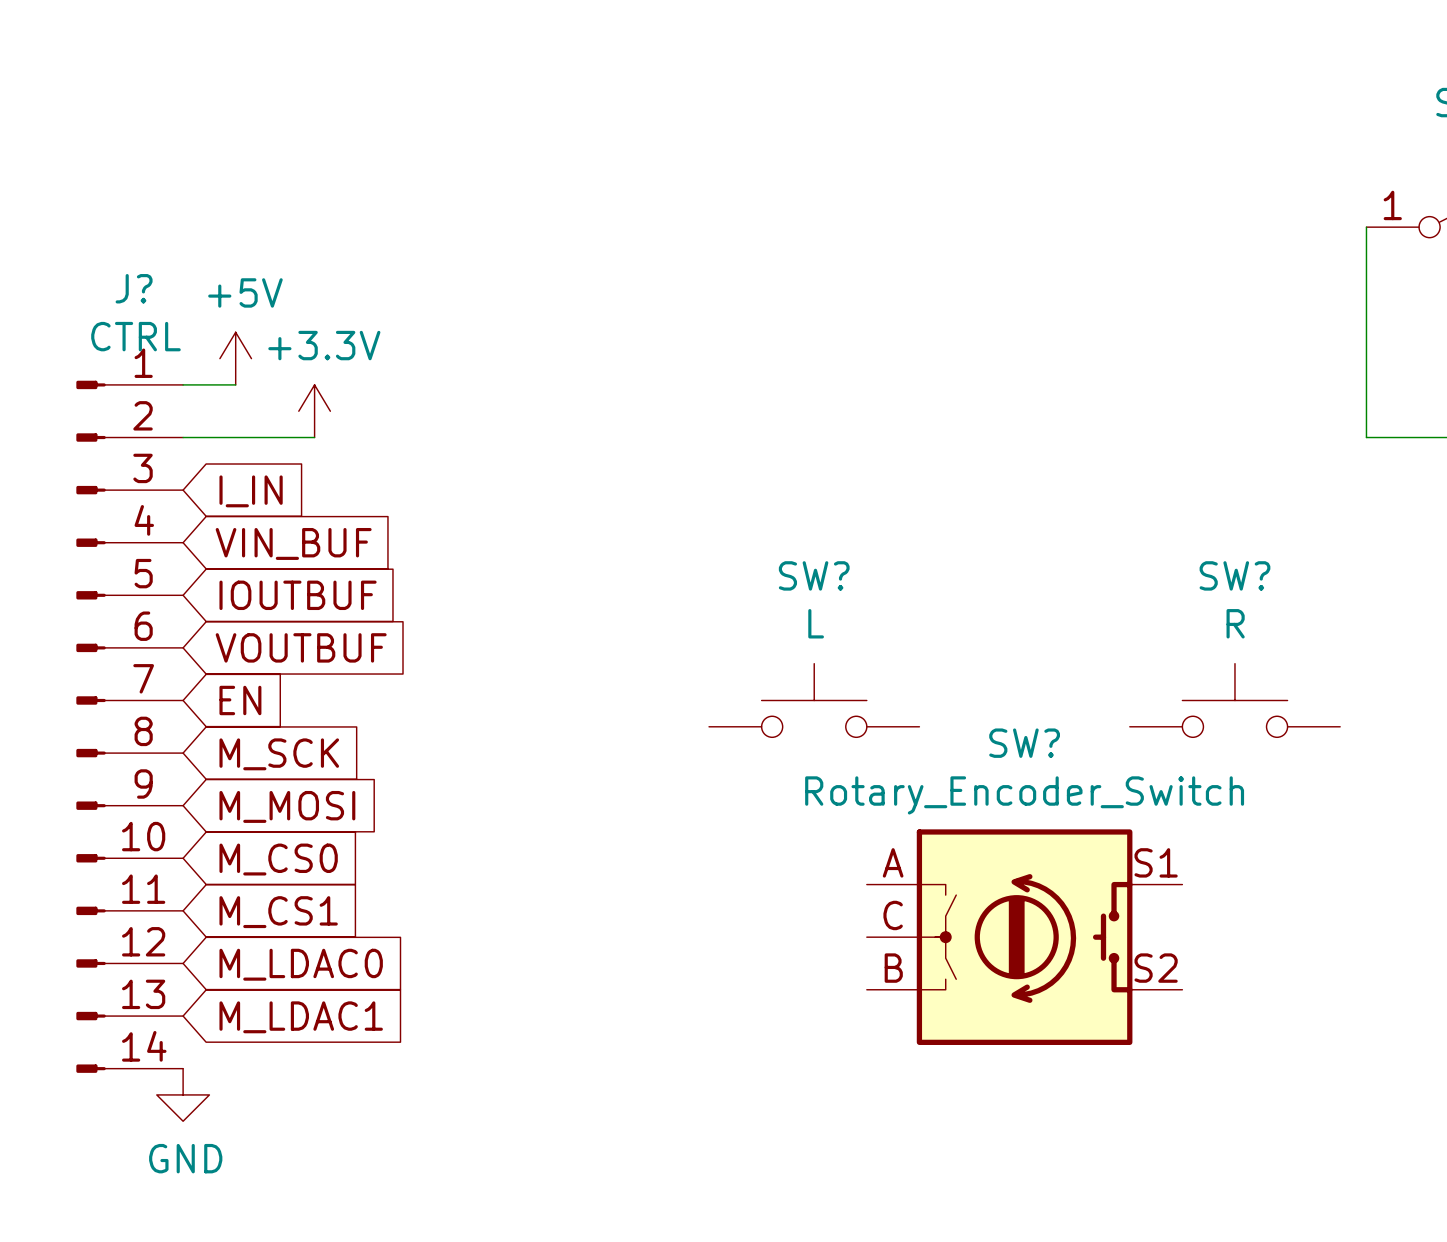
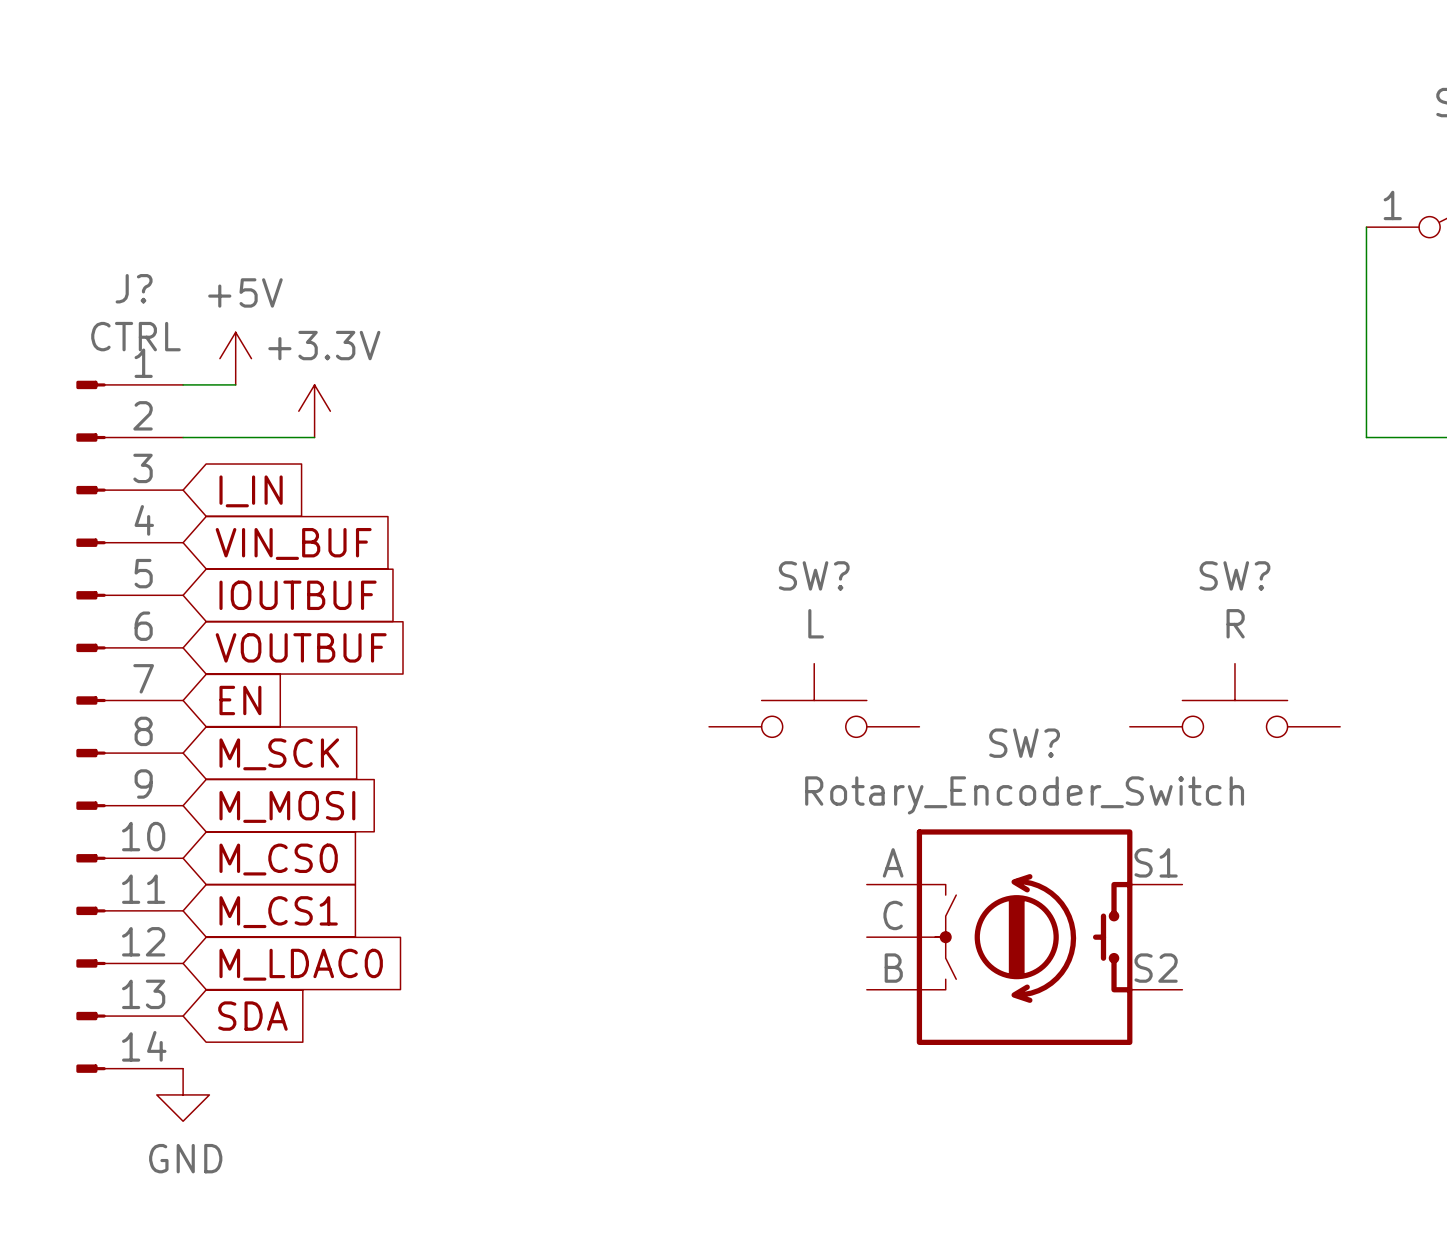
global label: M_LDAC1 (301, 1017) -> SDA (252, 1016)

